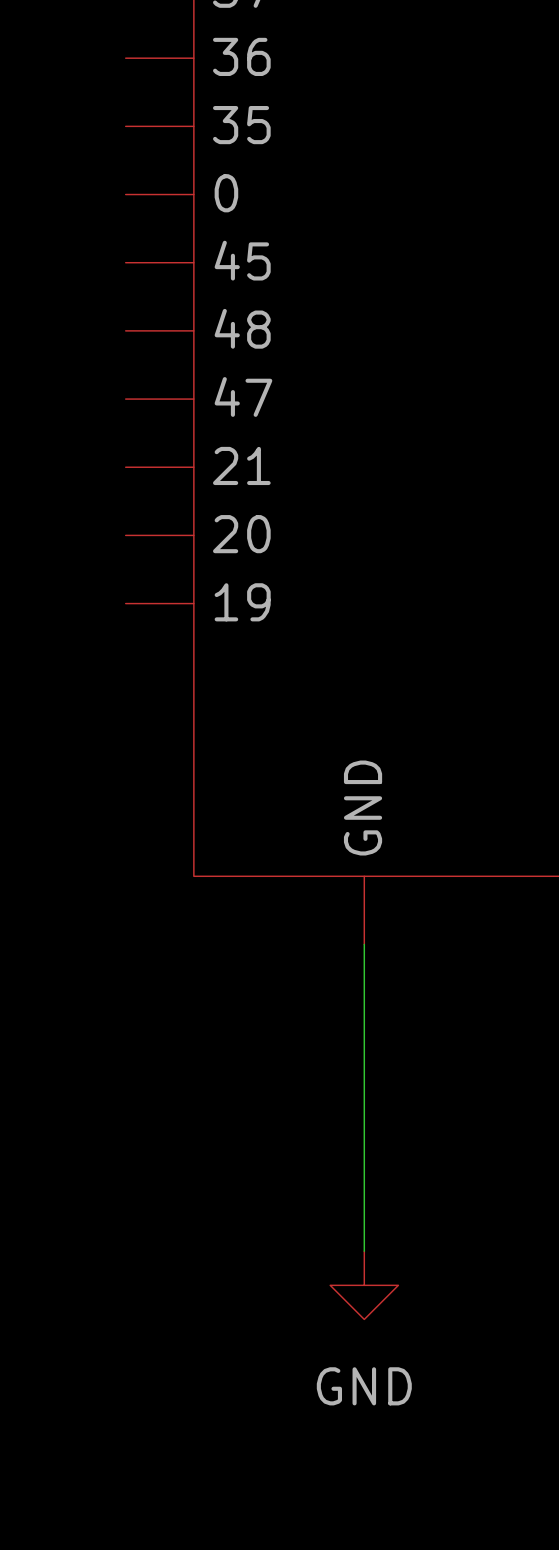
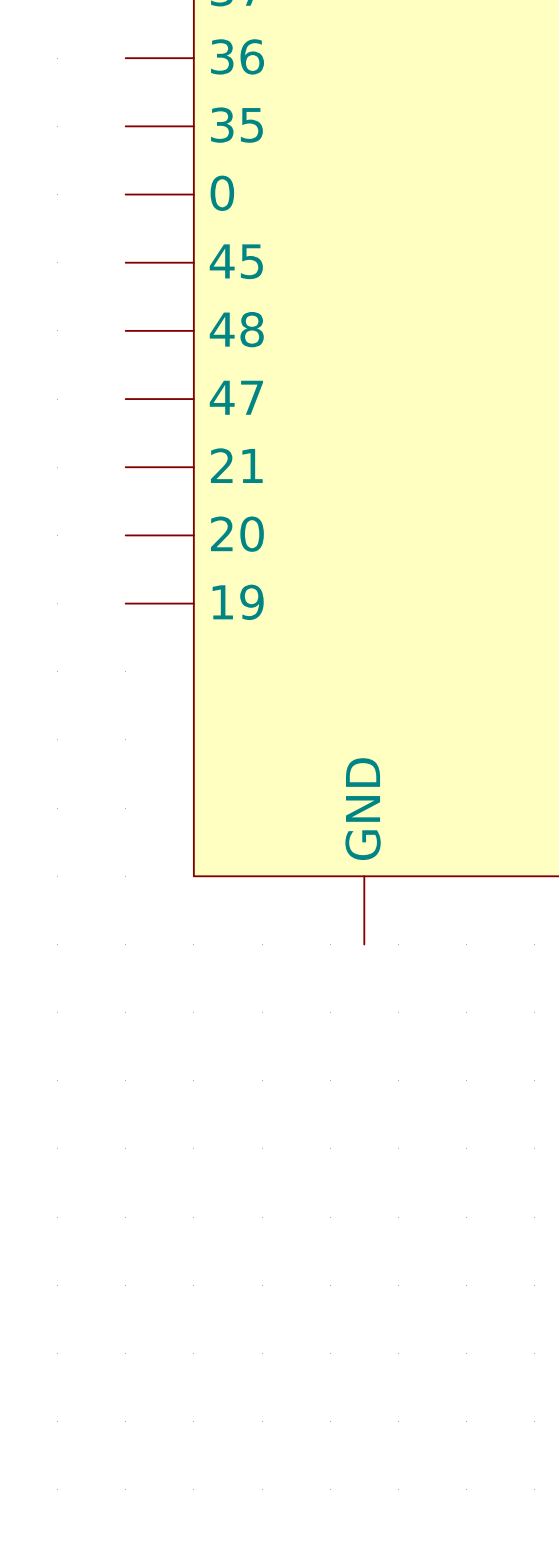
wire: (364, 944) (364, 1251) -> none
power symbol: GND (364, 1285) -> none

